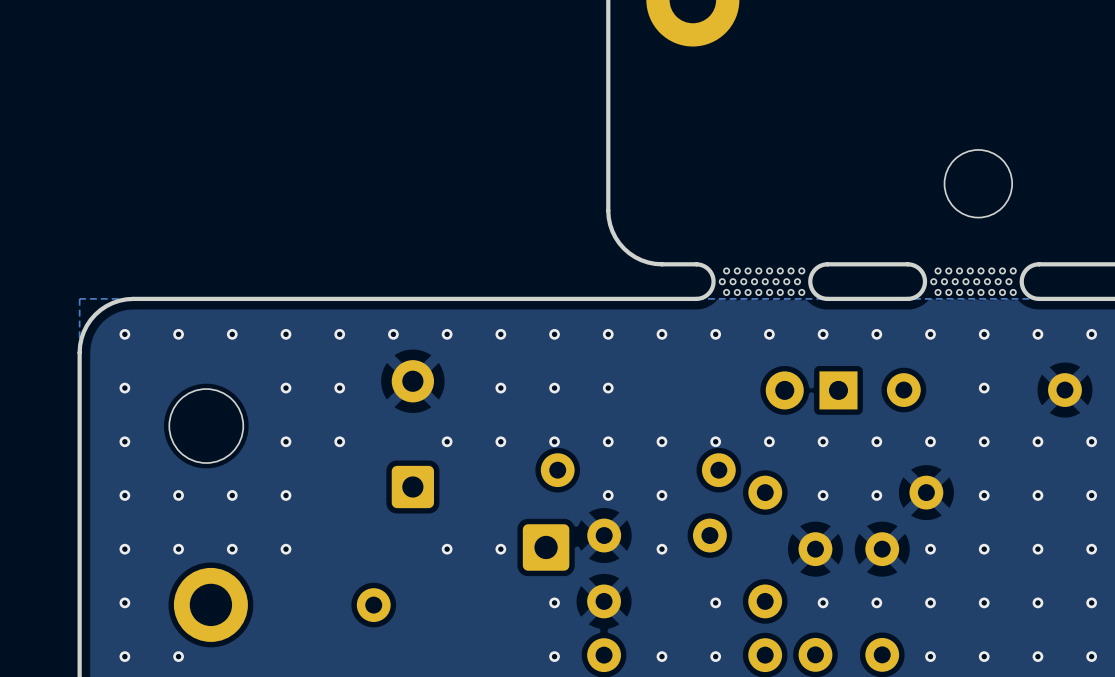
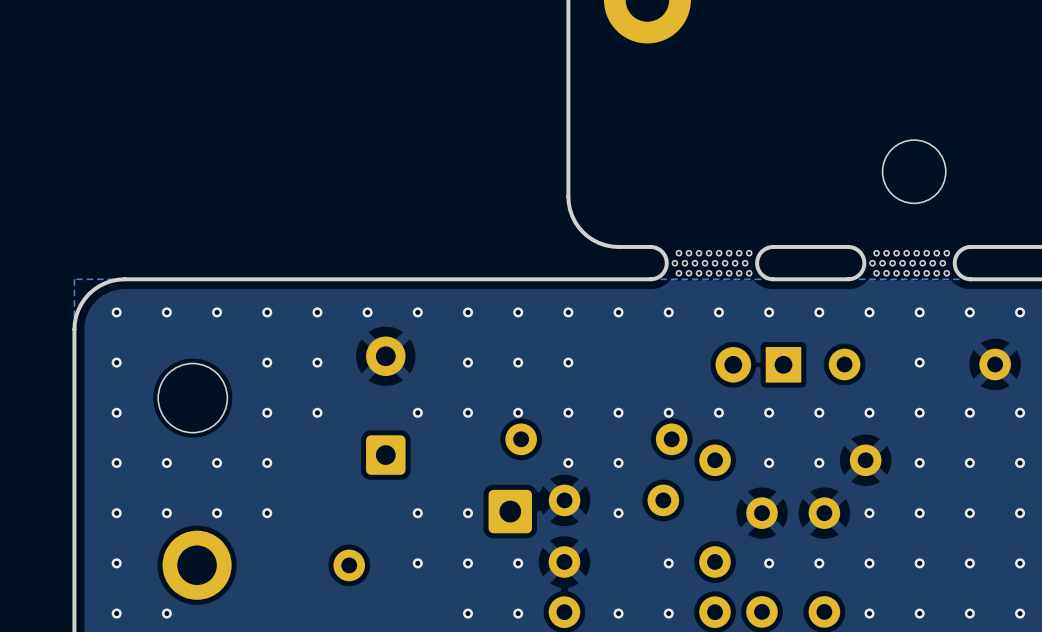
via: none -> (417, 563)
via: none -> (468, 563)
via: none -> (468, 613)

